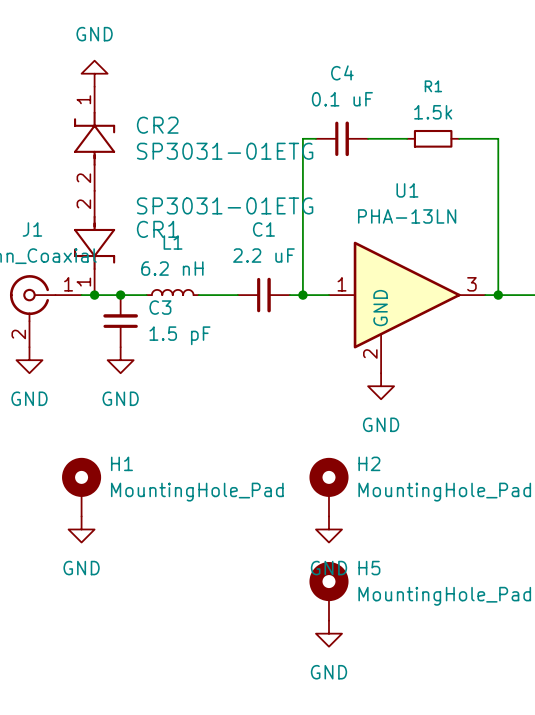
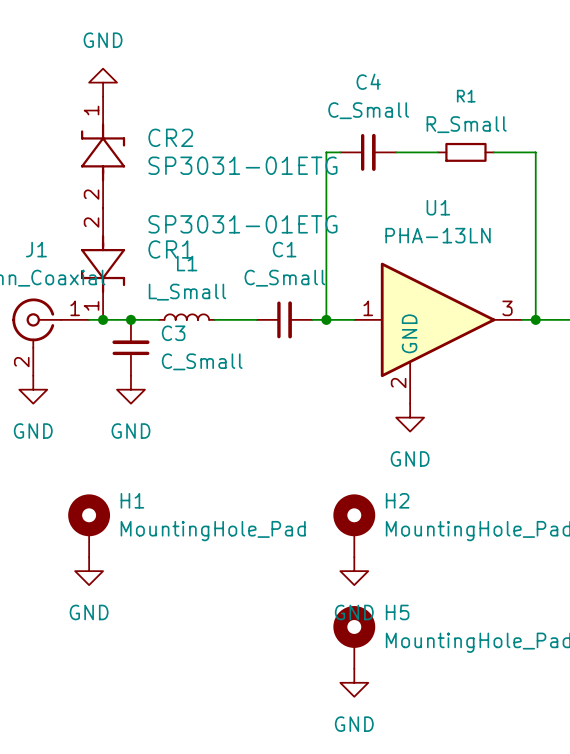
C4 value: 0.1 uF (342, 99) -> C_Small (368, 110)
R1 value: 1.5k (433, 112) -> R_Small (466, 124)
C1 value: 2.2 uF (263, 255) -> C_Small (284, 278)
L1 value: 6.2 nH (172, 268) -> L_Small (187, 292)
C3 value: 1.5 pF (179, 335) -> C_Small (202, 361)

